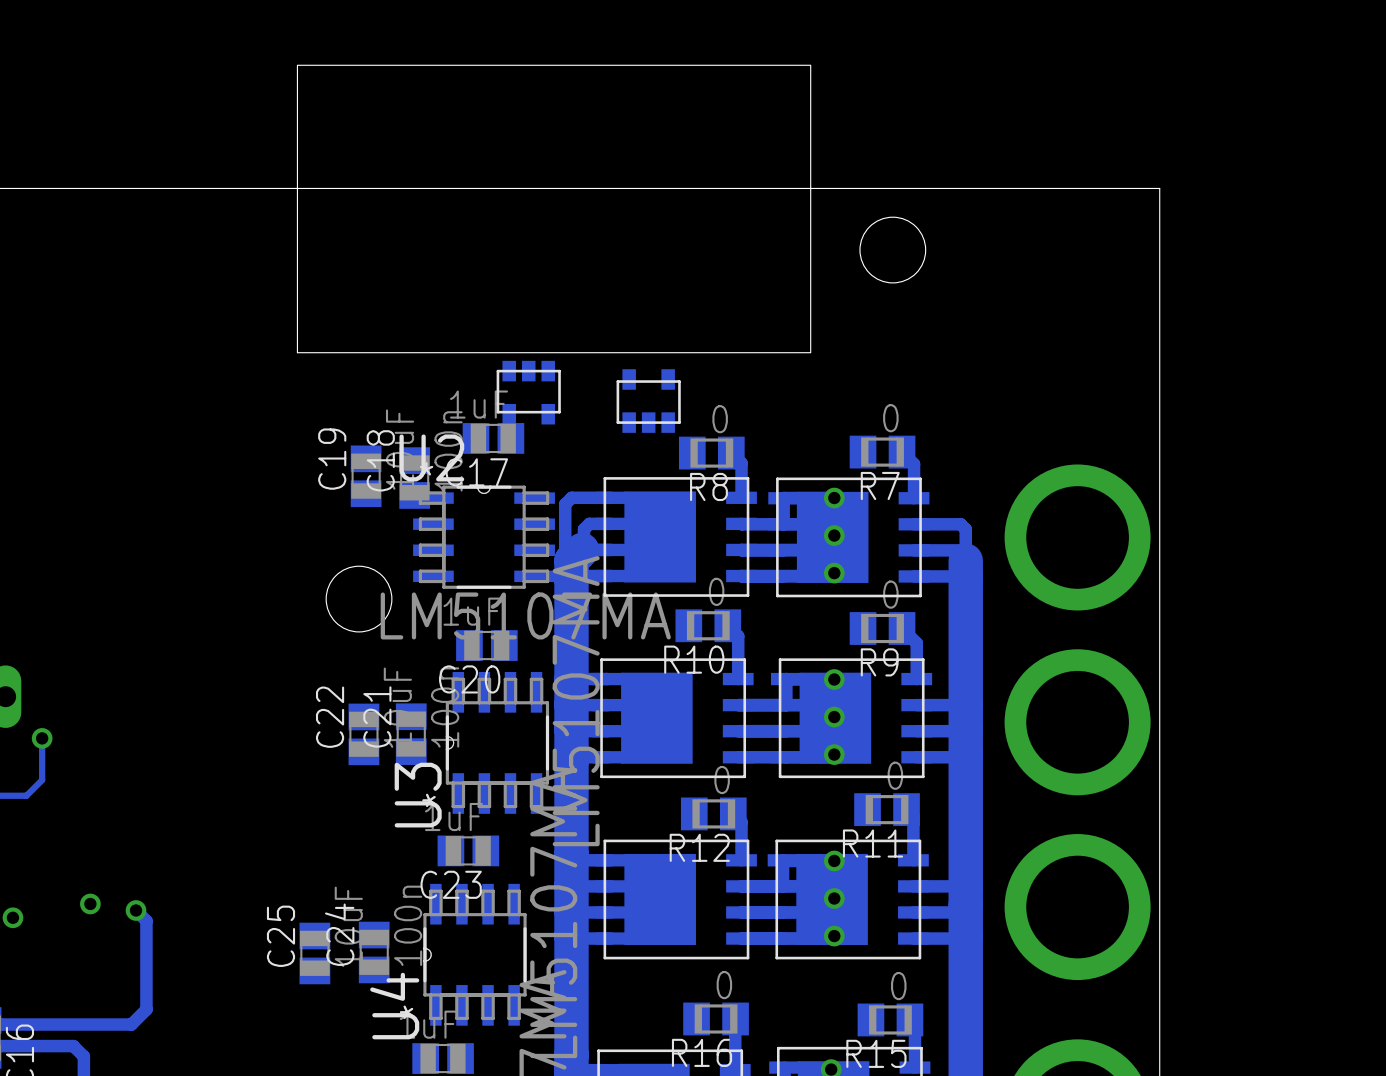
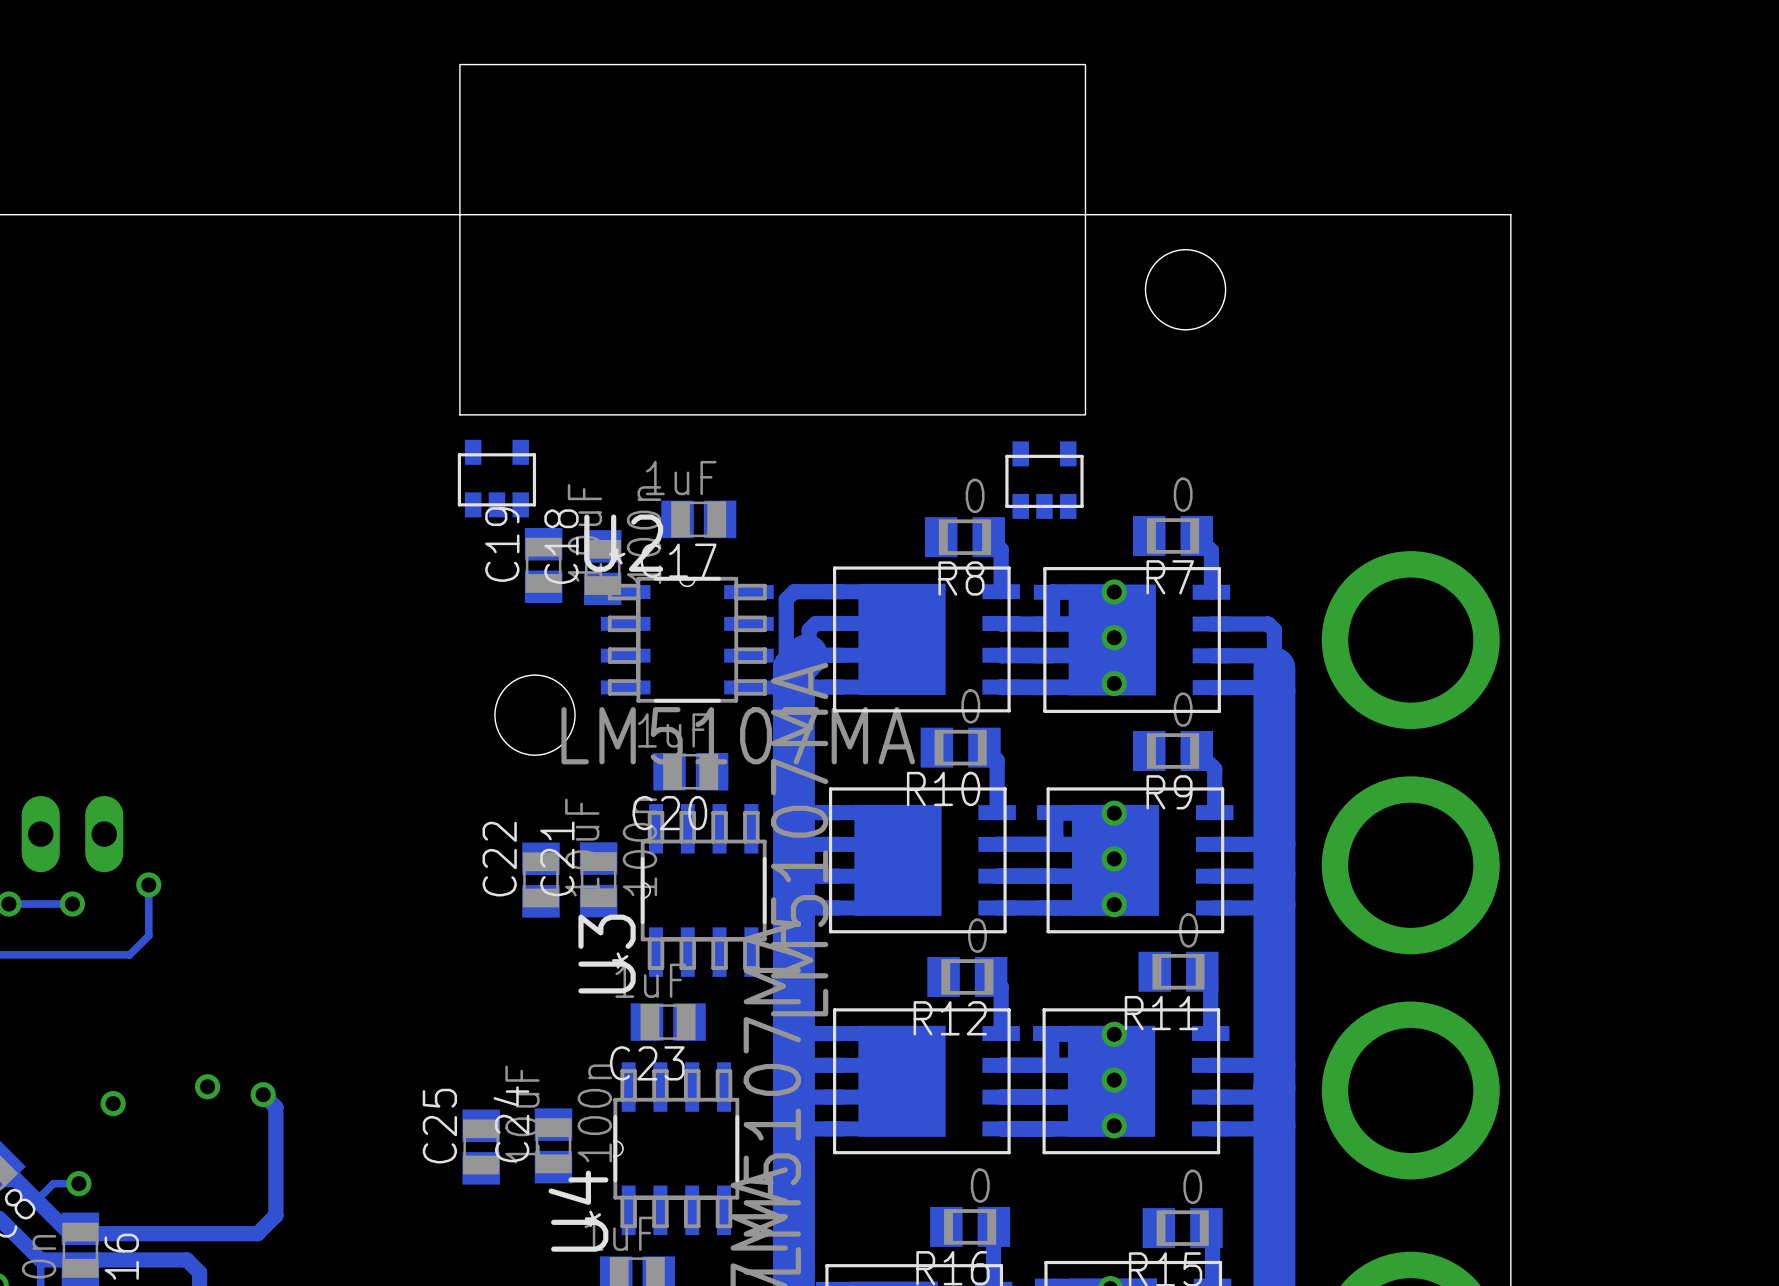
part: (528, 392) -> none
part: (648, 401) -> none
part: none -> (496, 478)
part: none -> (1044, 480)

